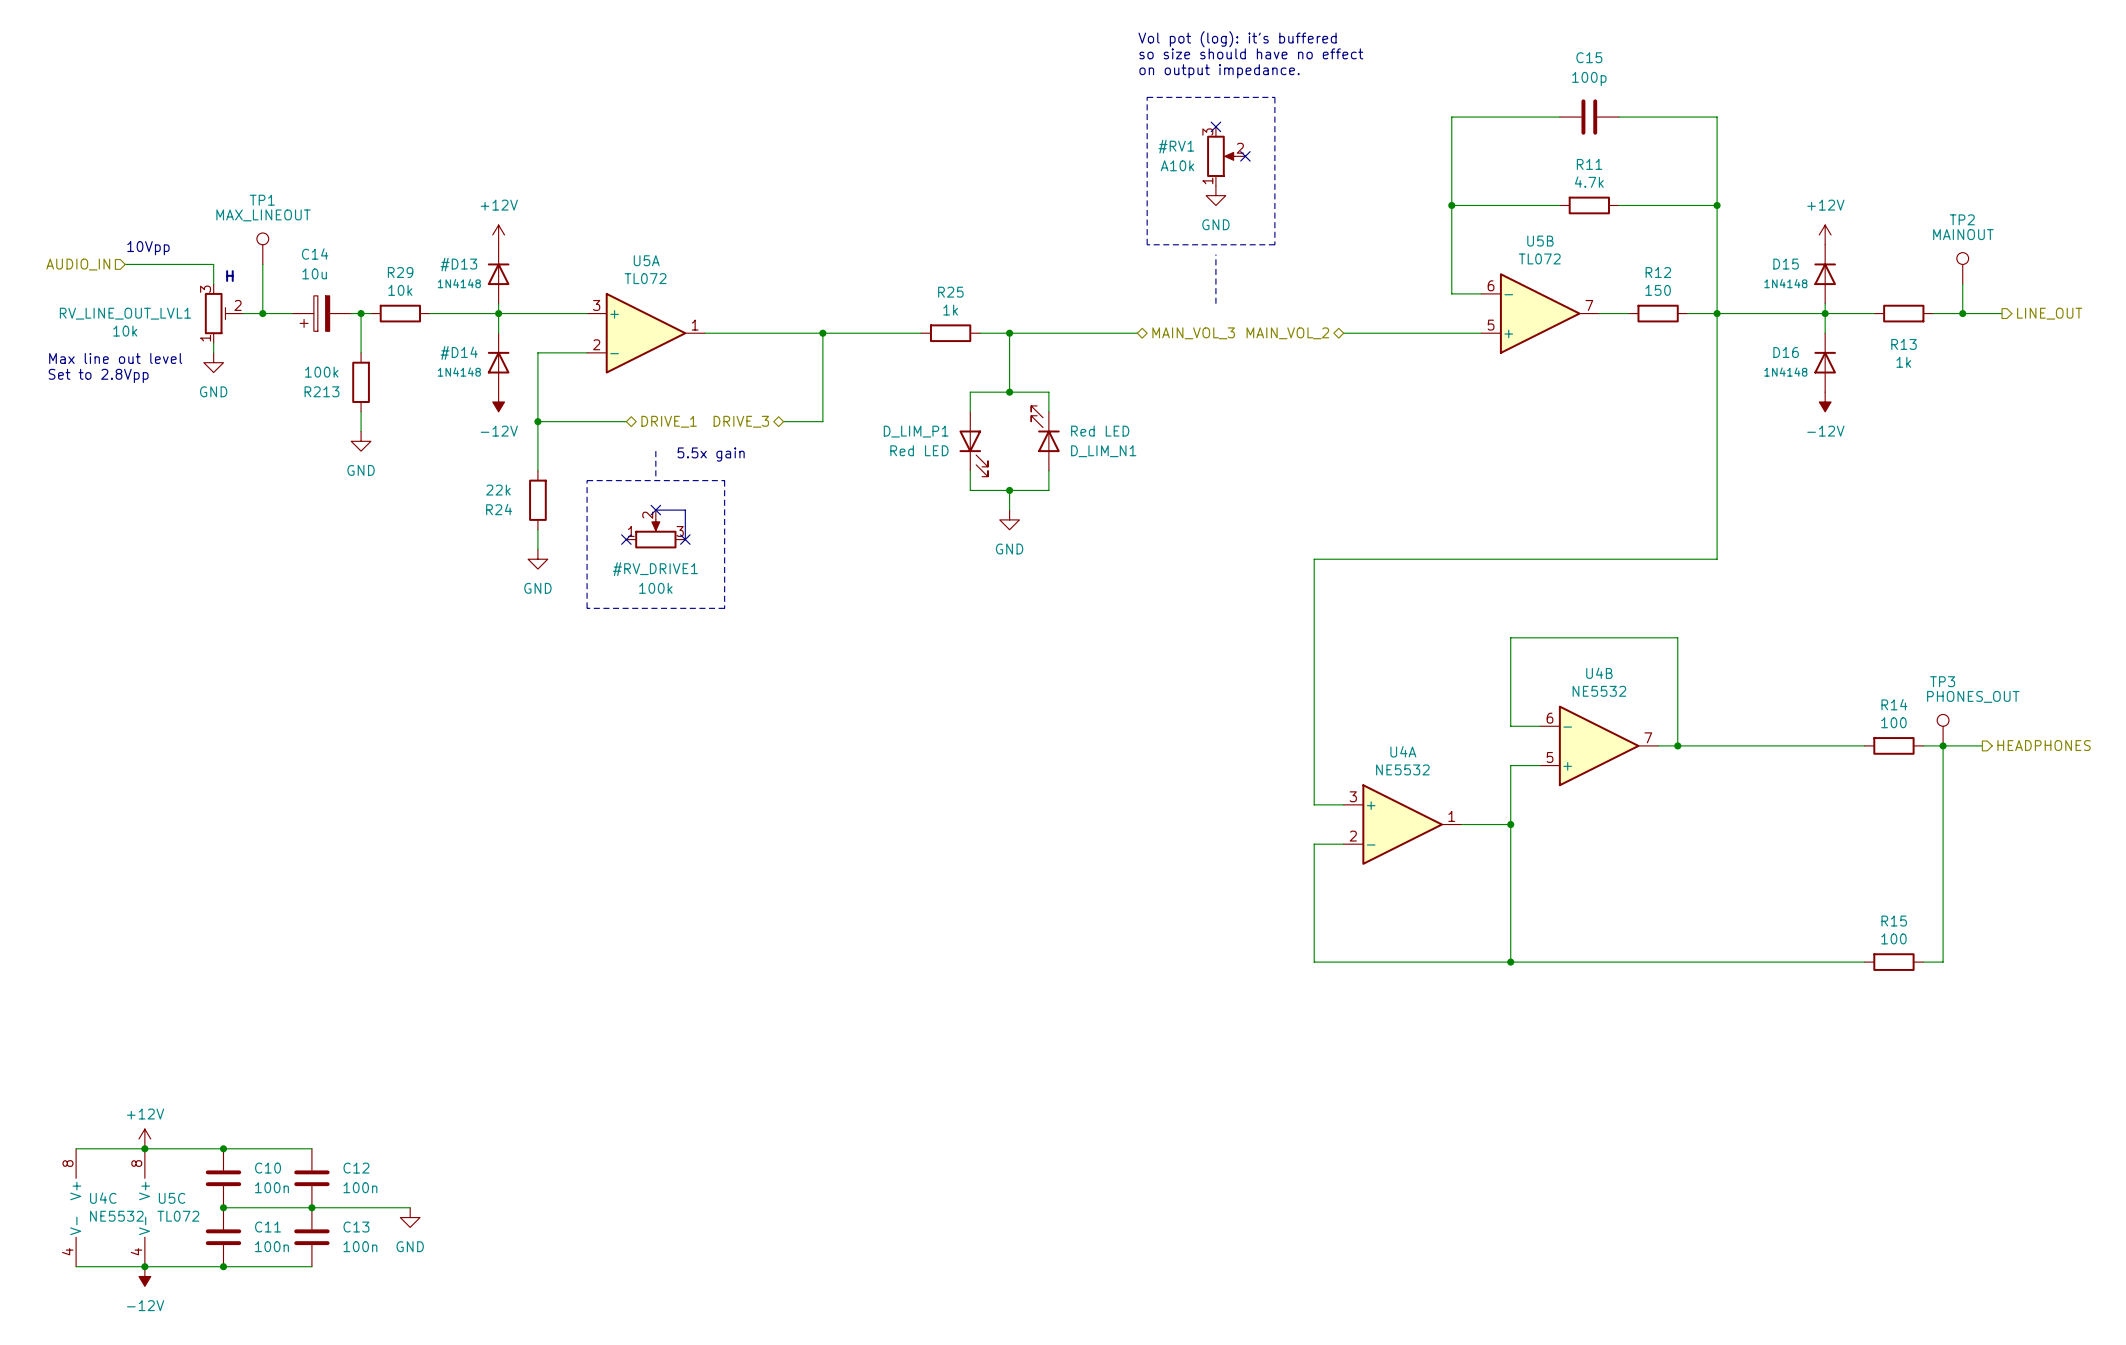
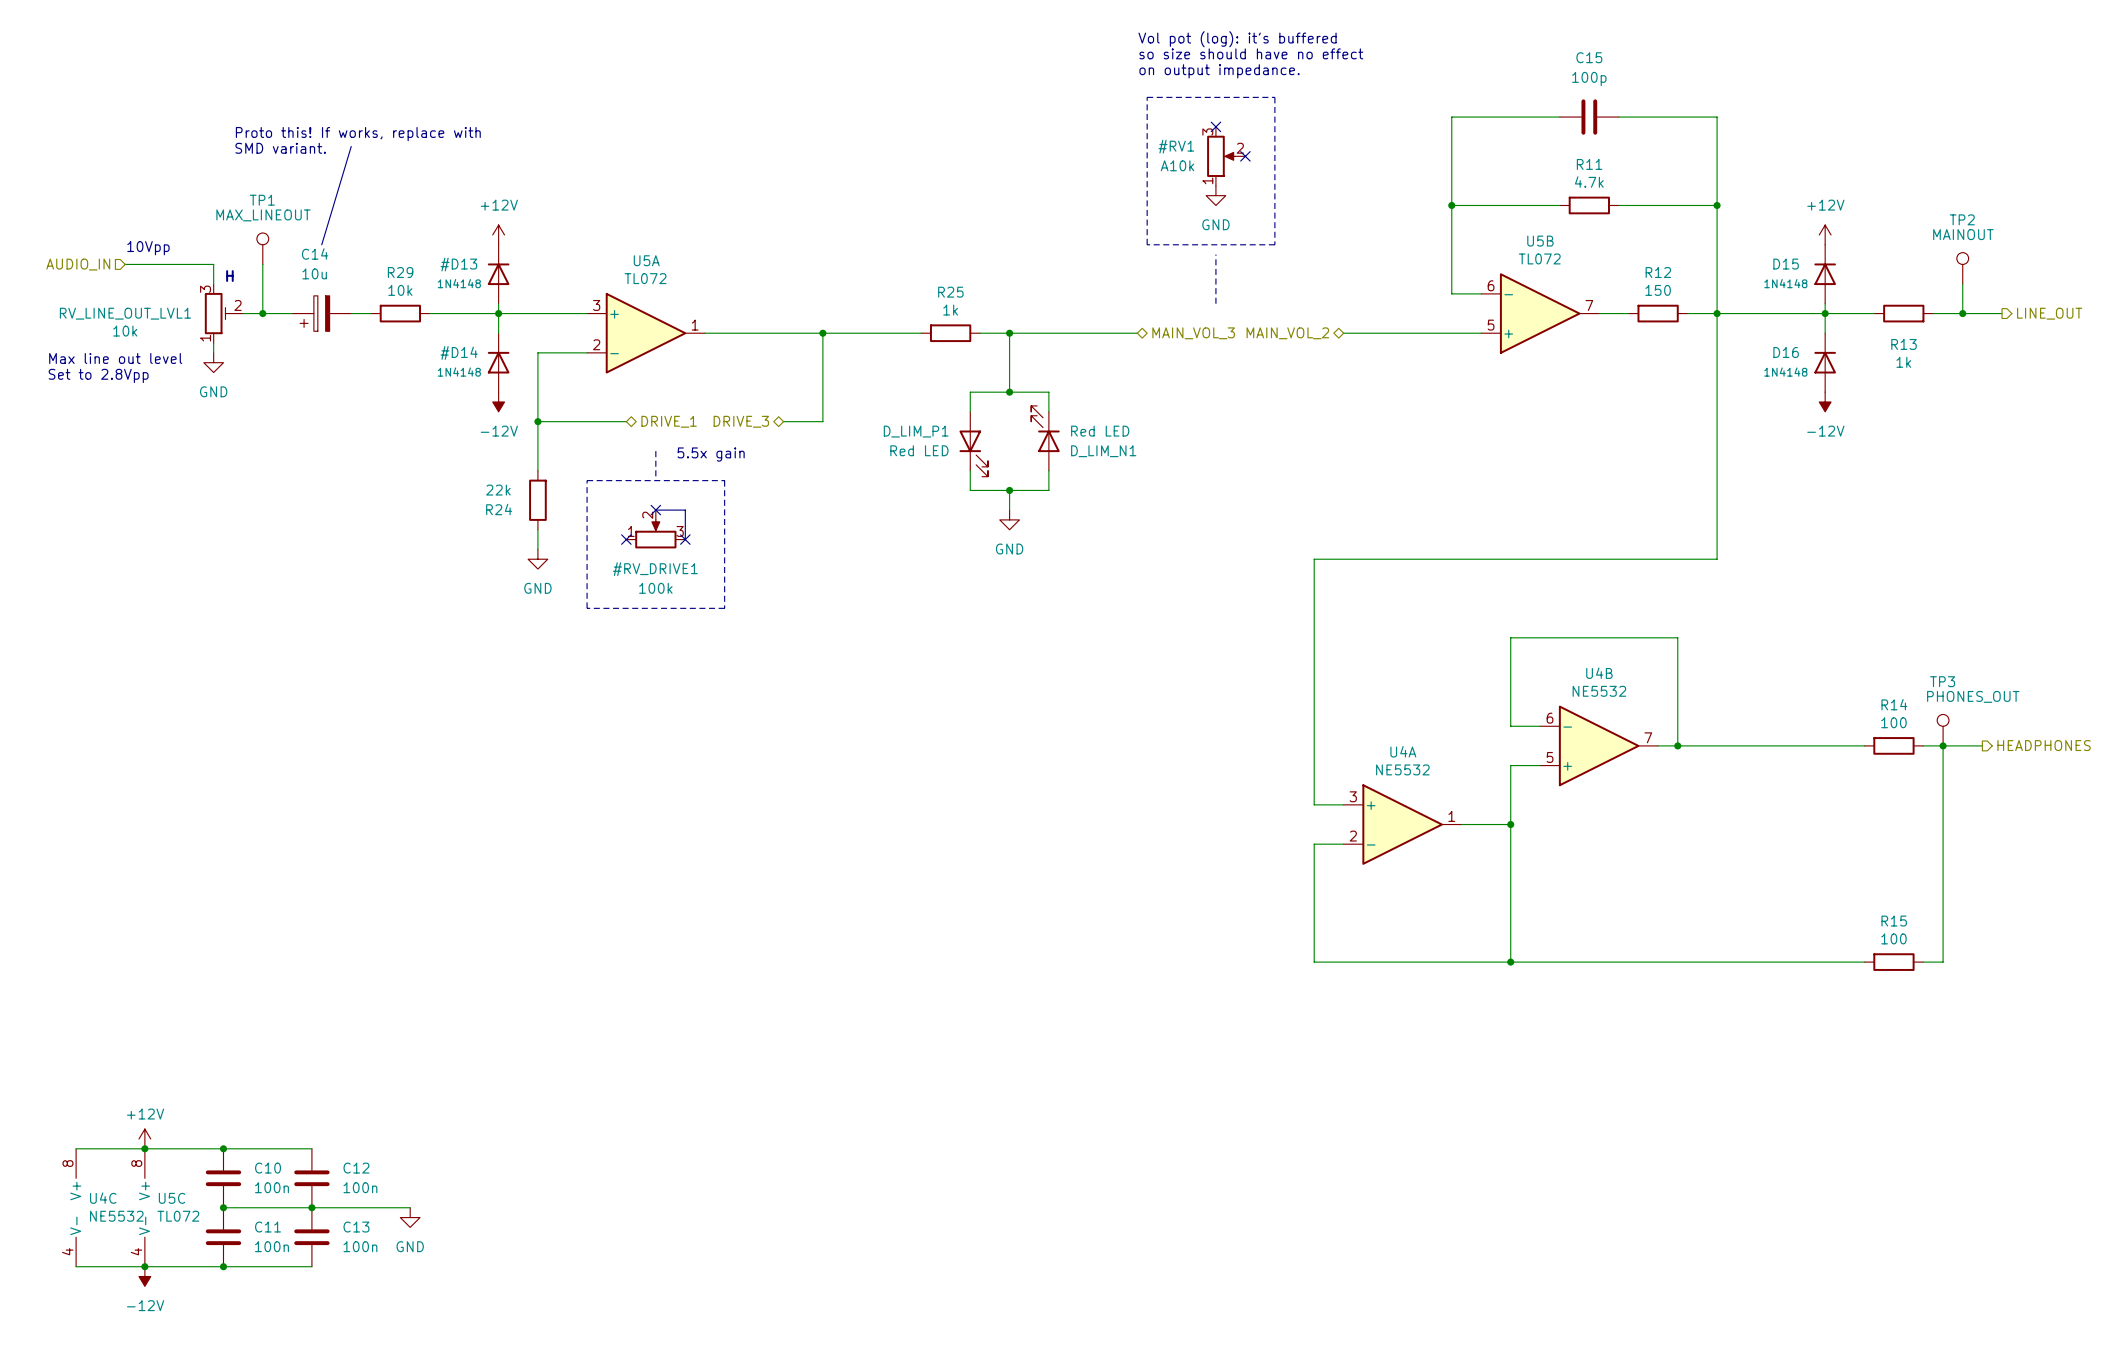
text: none -> Proto this! If works, replace with (358, 134)
line: none -> (351, 146) (321, 244)
text: none -> SMD variant. (280, 148)
wire: (361, 313) (361, 352) -> none
junction: (361, 313) -> none
R213: 100k (361, 382) -> none
wire: (361, 411) (361, 431) -> none
power symbol: GND (361, 441) -> none

